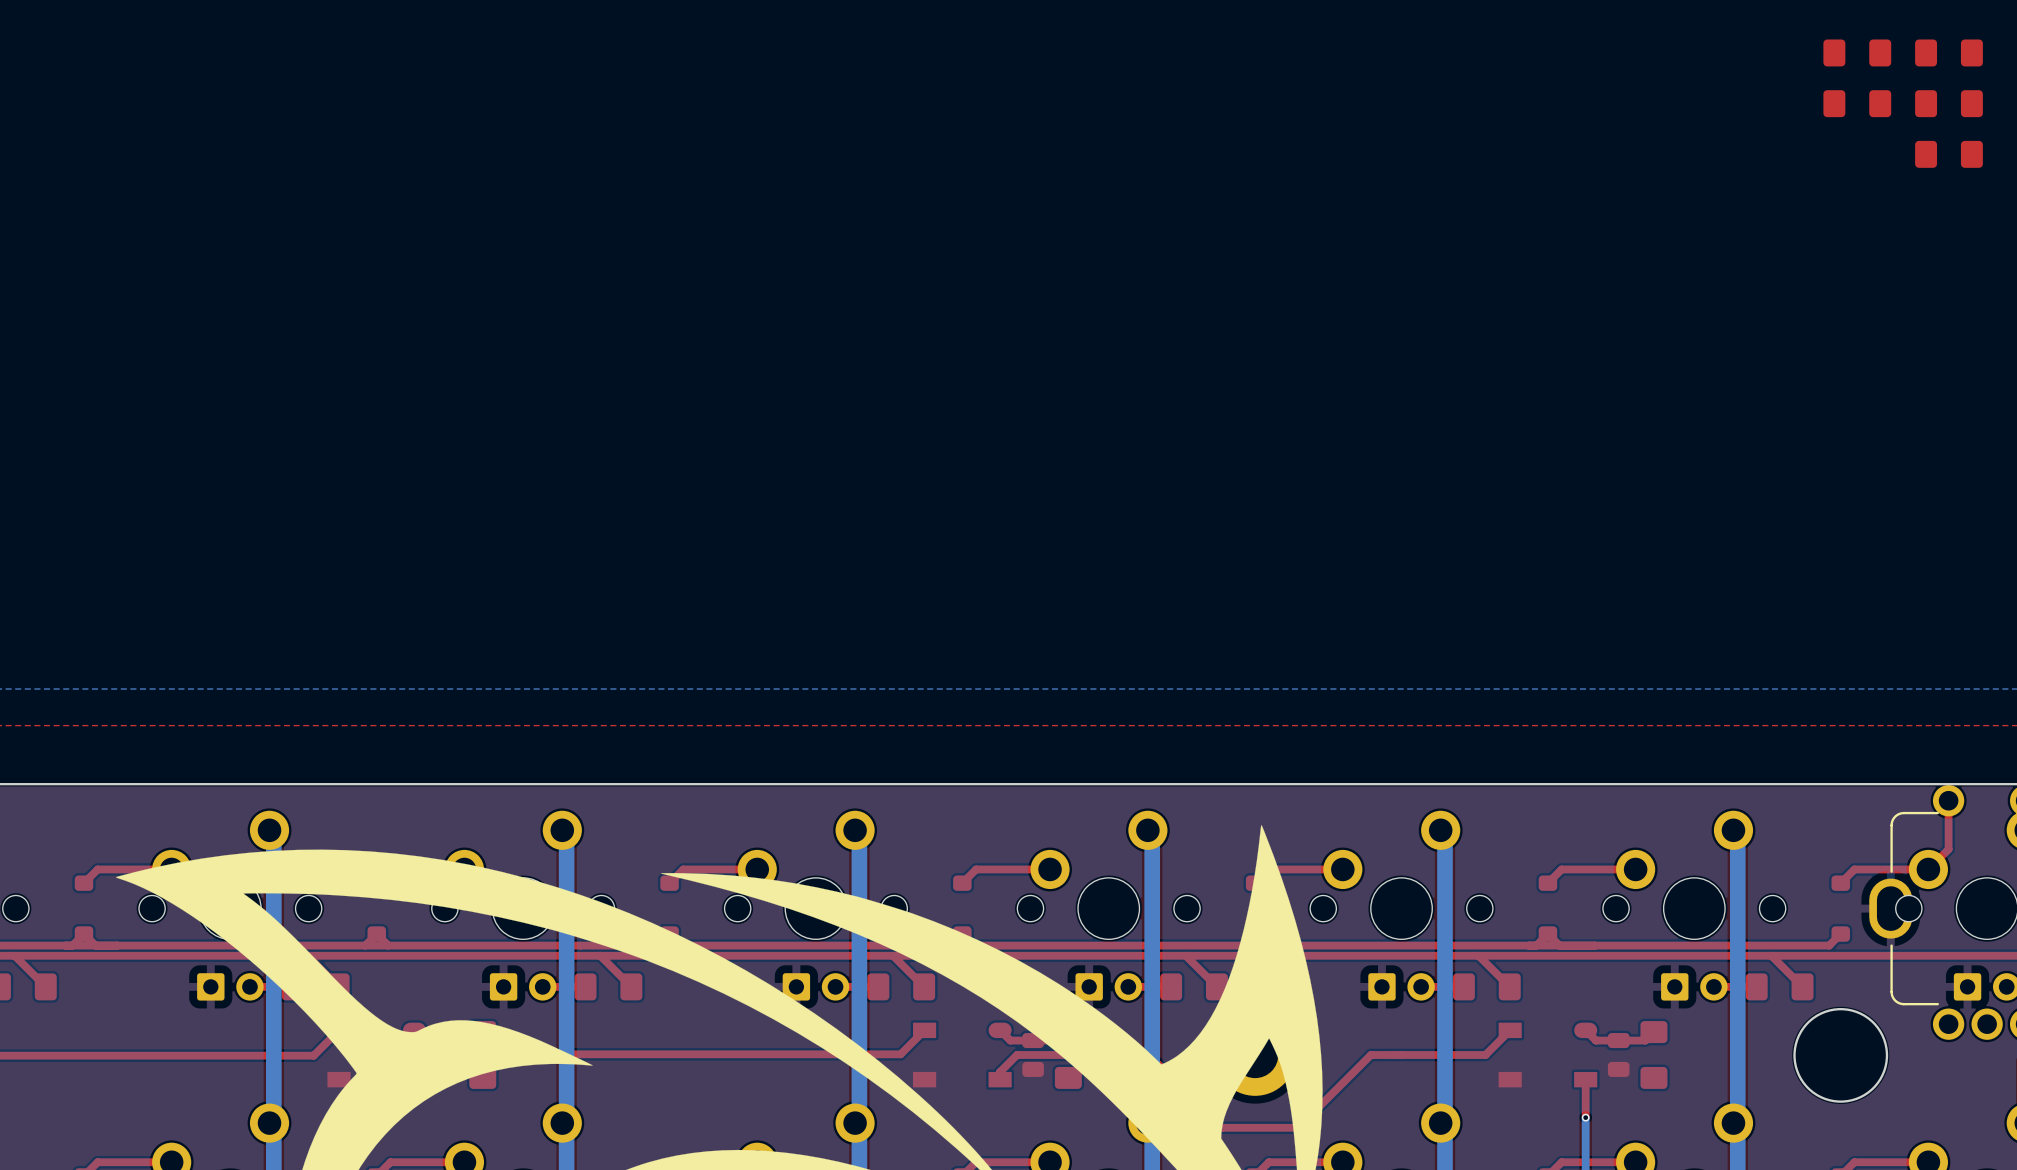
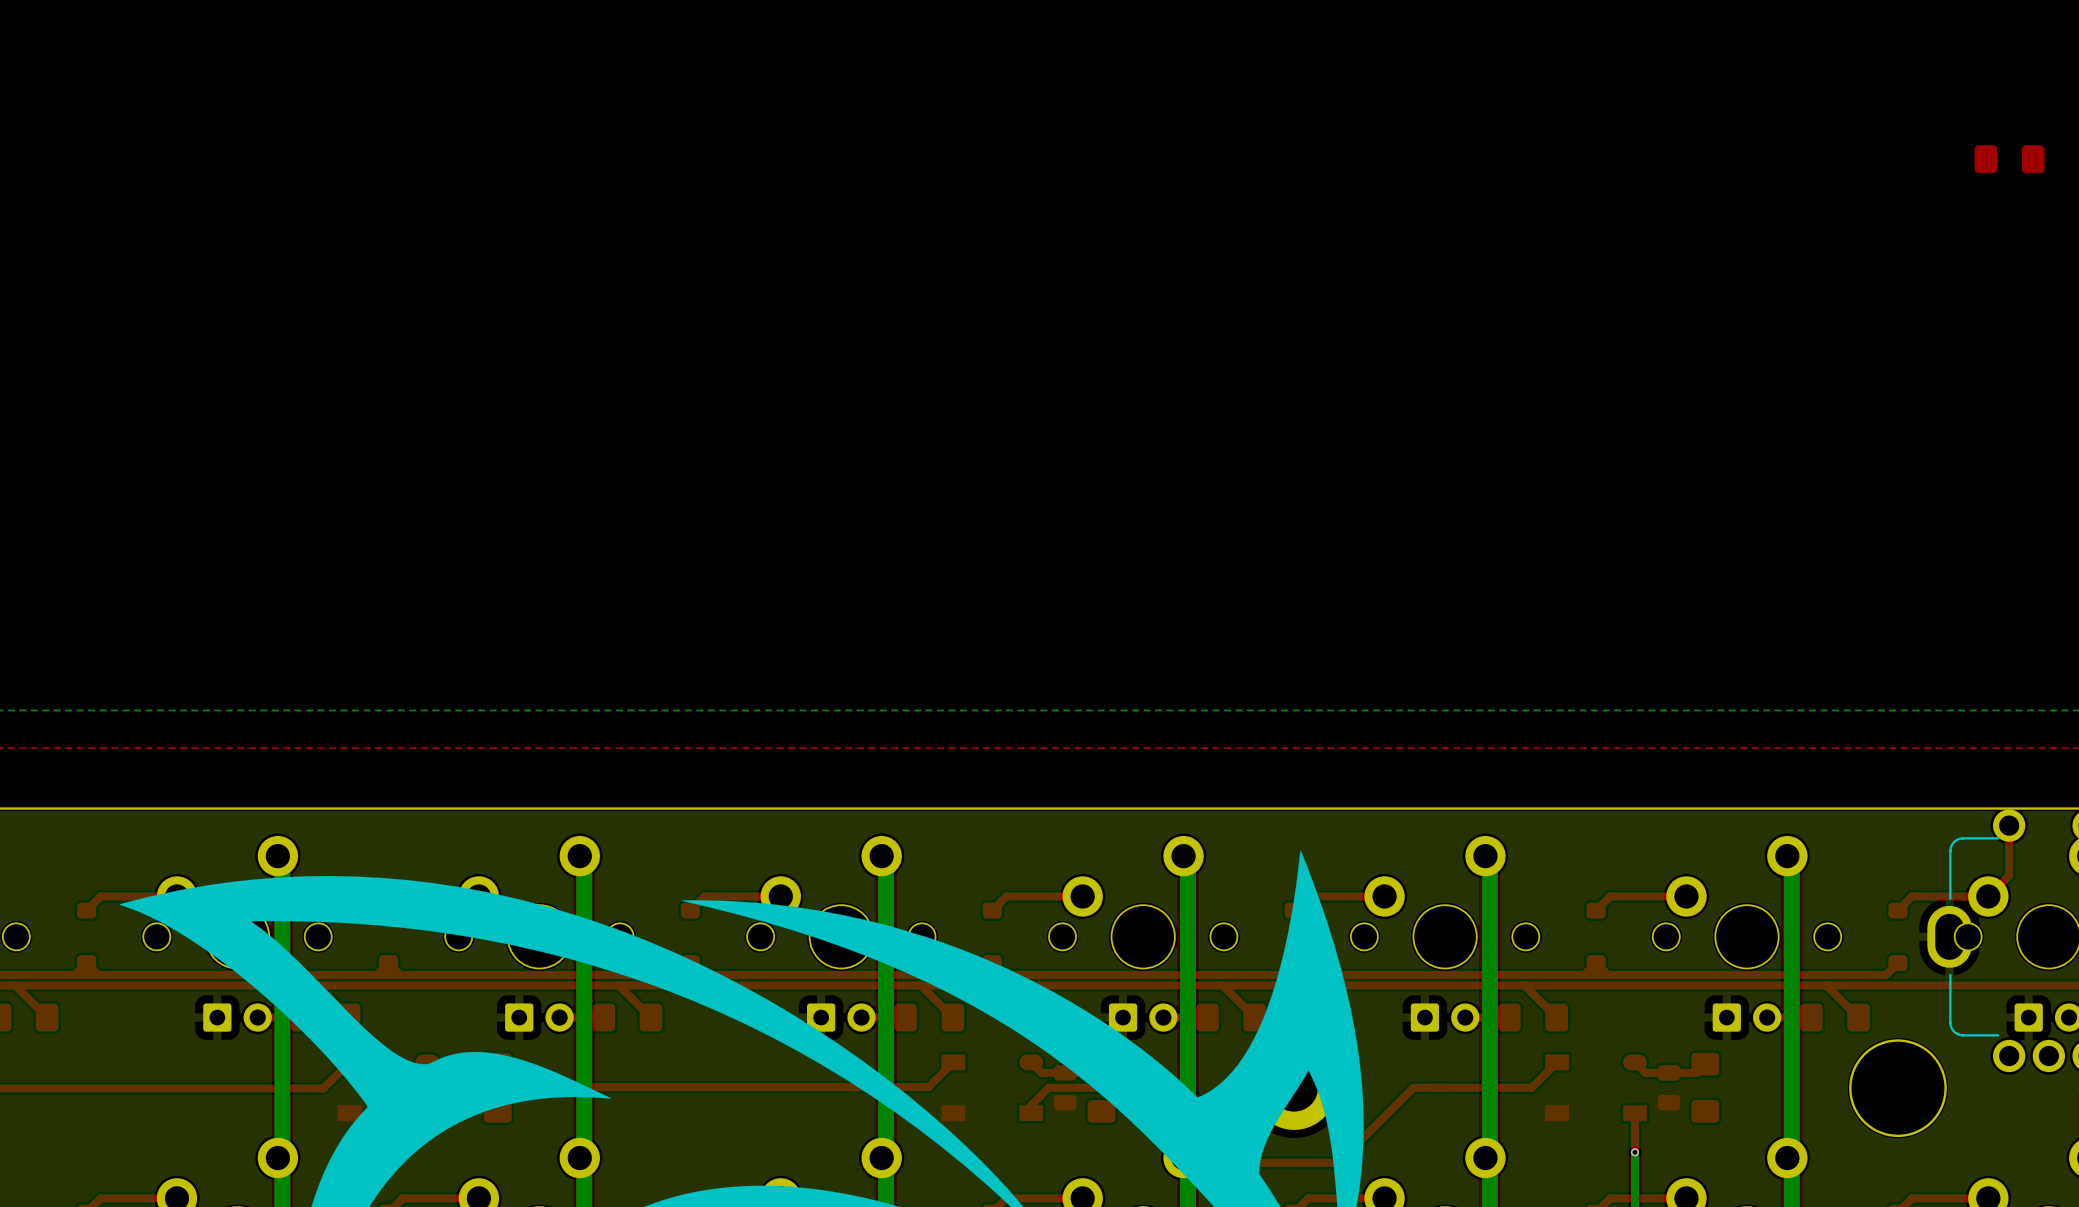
part: (1857, 52) -> none
part: (1948, 52) -> none
part: (1857, 103) -> none
part: (1948, 103) -> none

